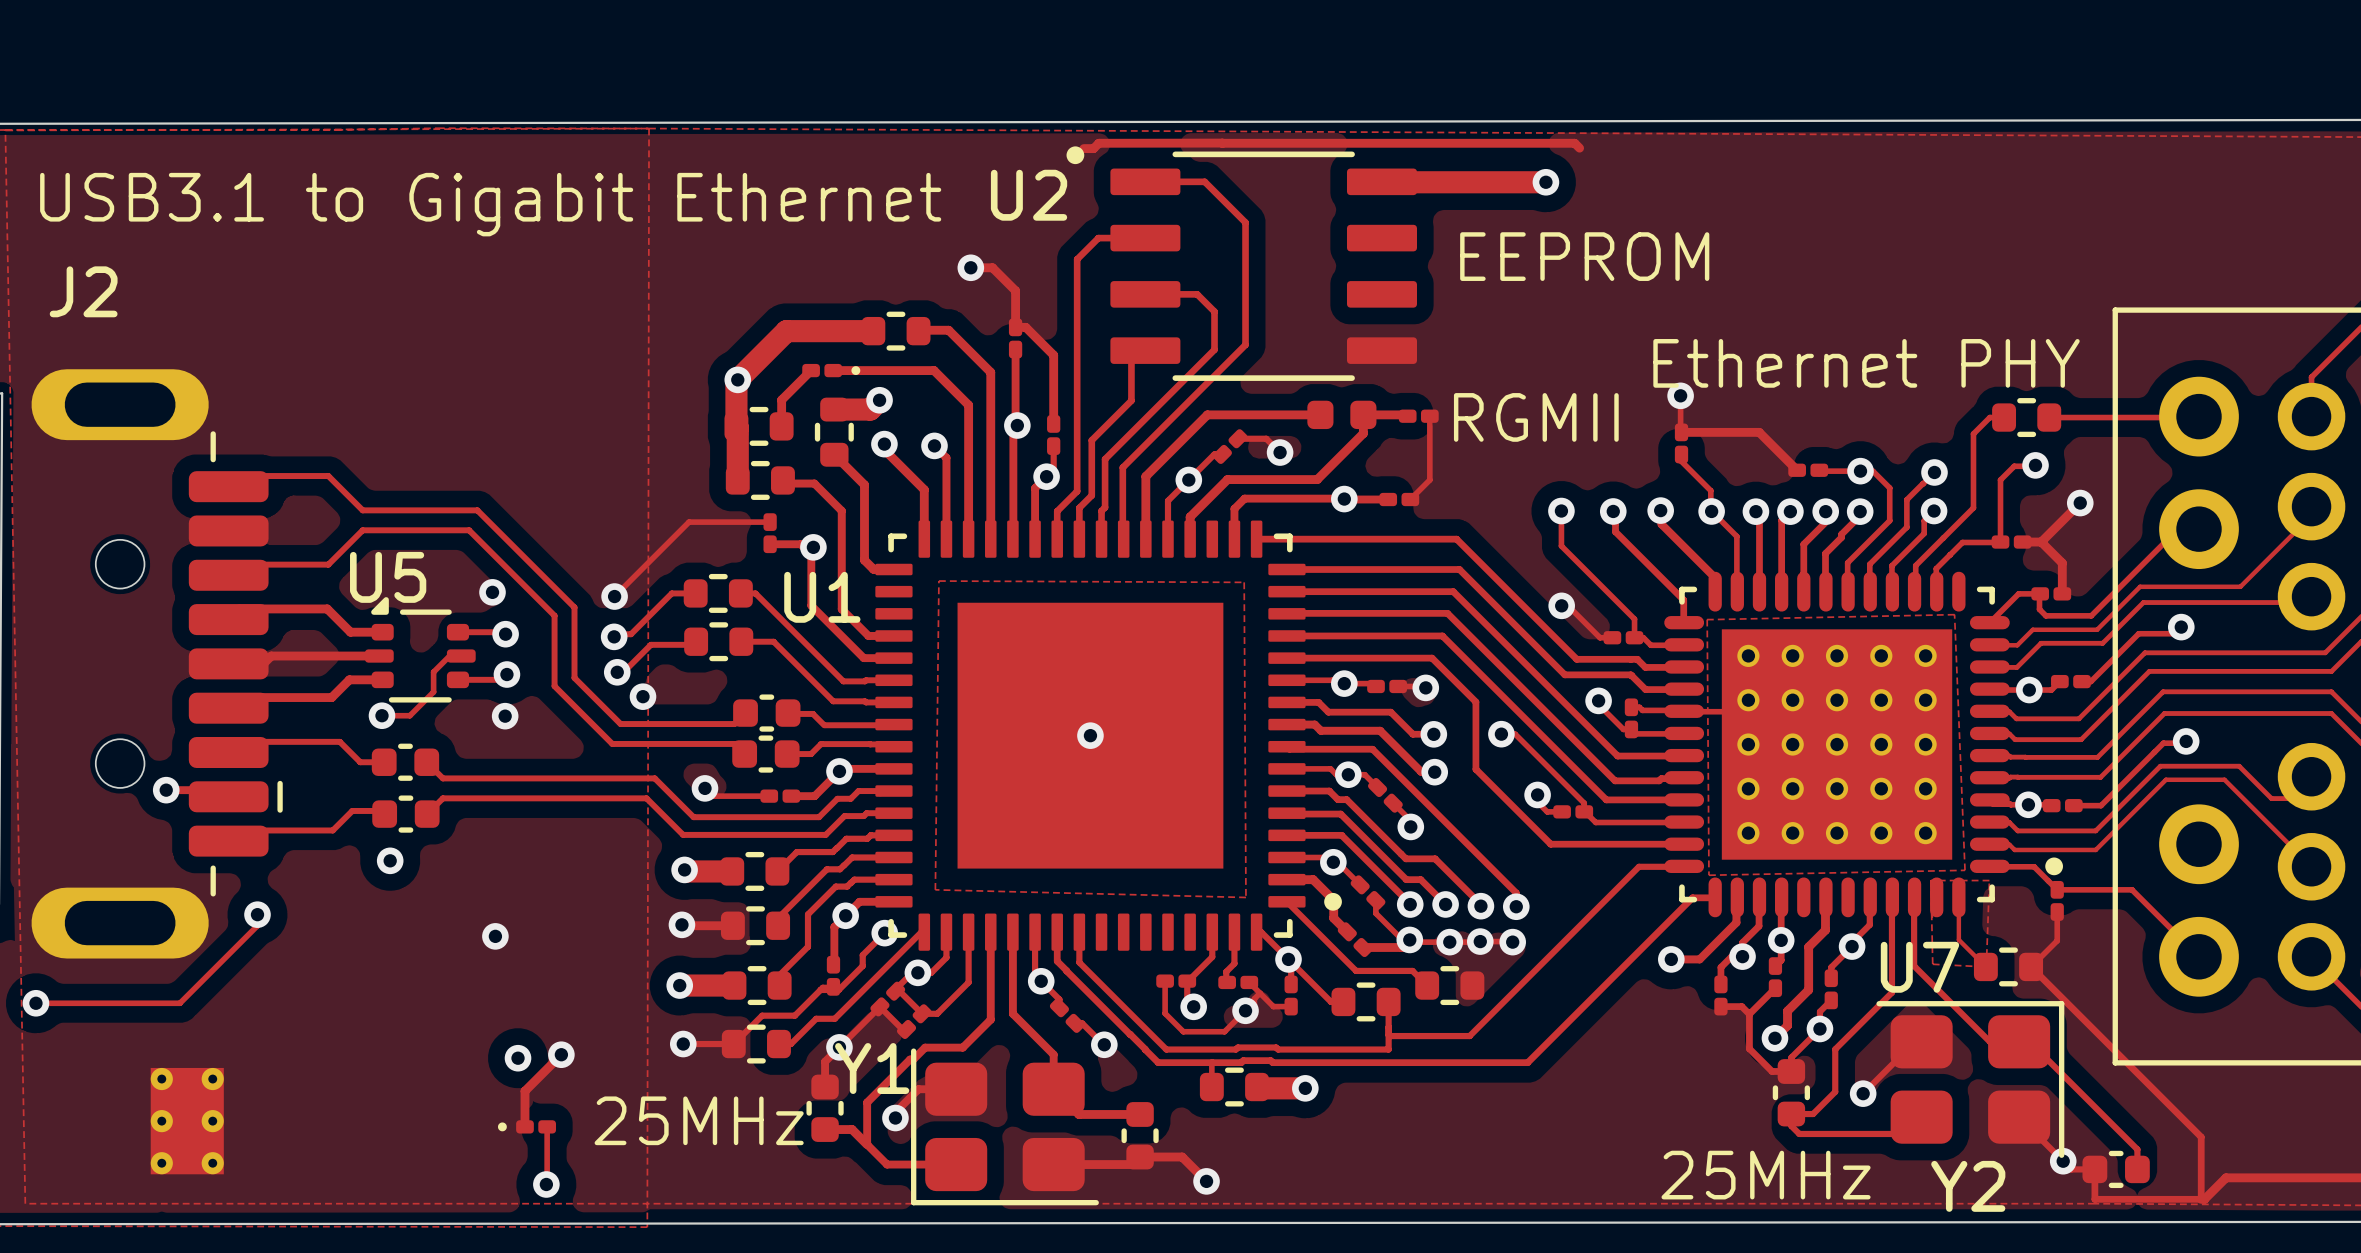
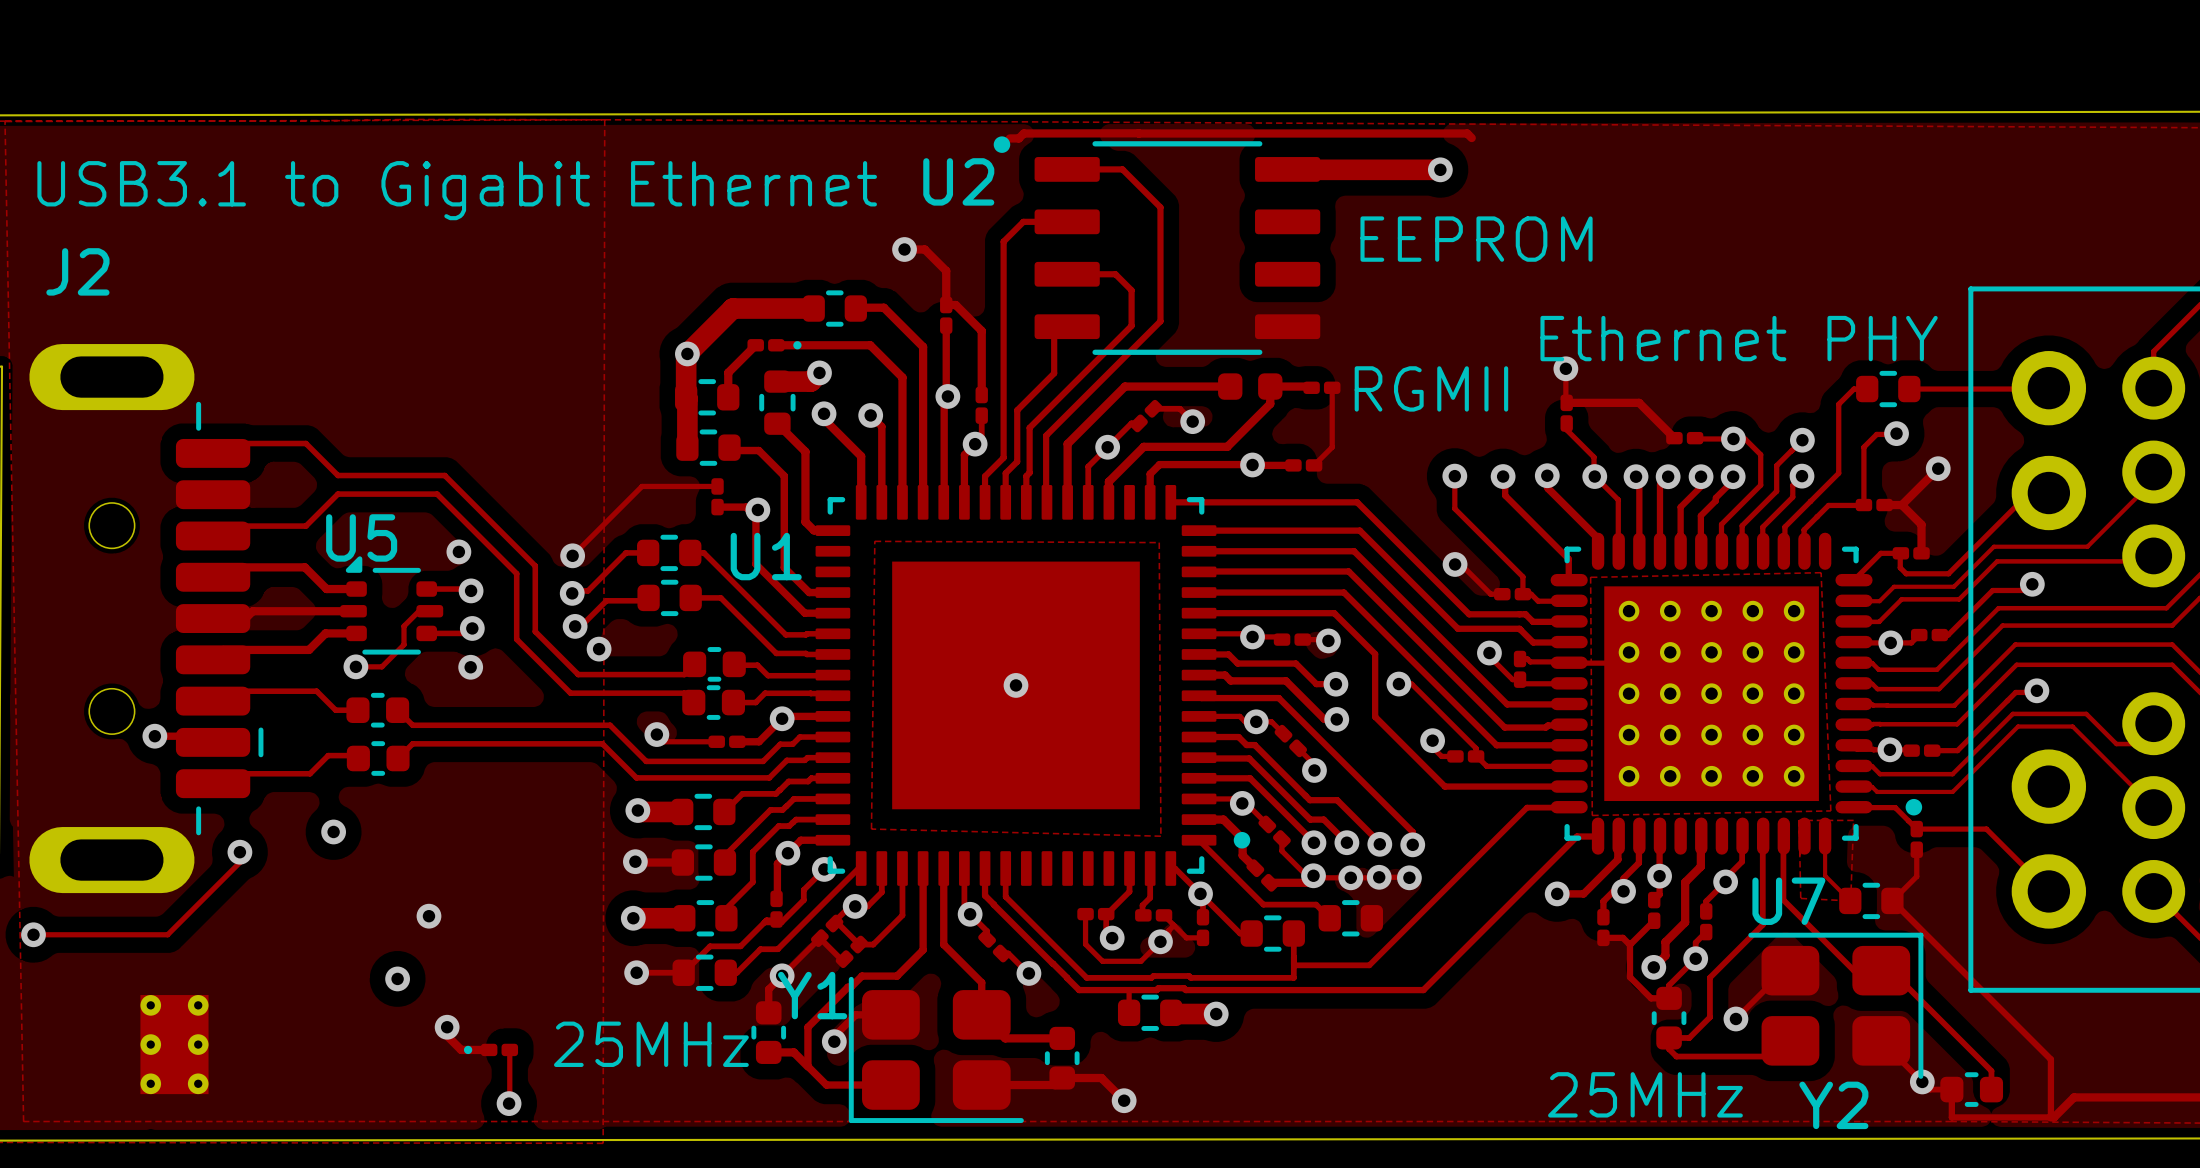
via position: (390, 860) -> (333, 831)
via: (495, 936) -> none
via: none -> (428, 916)
via: none -> (397, 978)
track: (561, 1054) (524, 1091) (524, 1126) -> (447, 1027) (447, 1035) (461, 1049) (489, 1049)
via: (561, 1054) -> none
via: (518, 1058) -> none
via: none -> (447, 1027)

